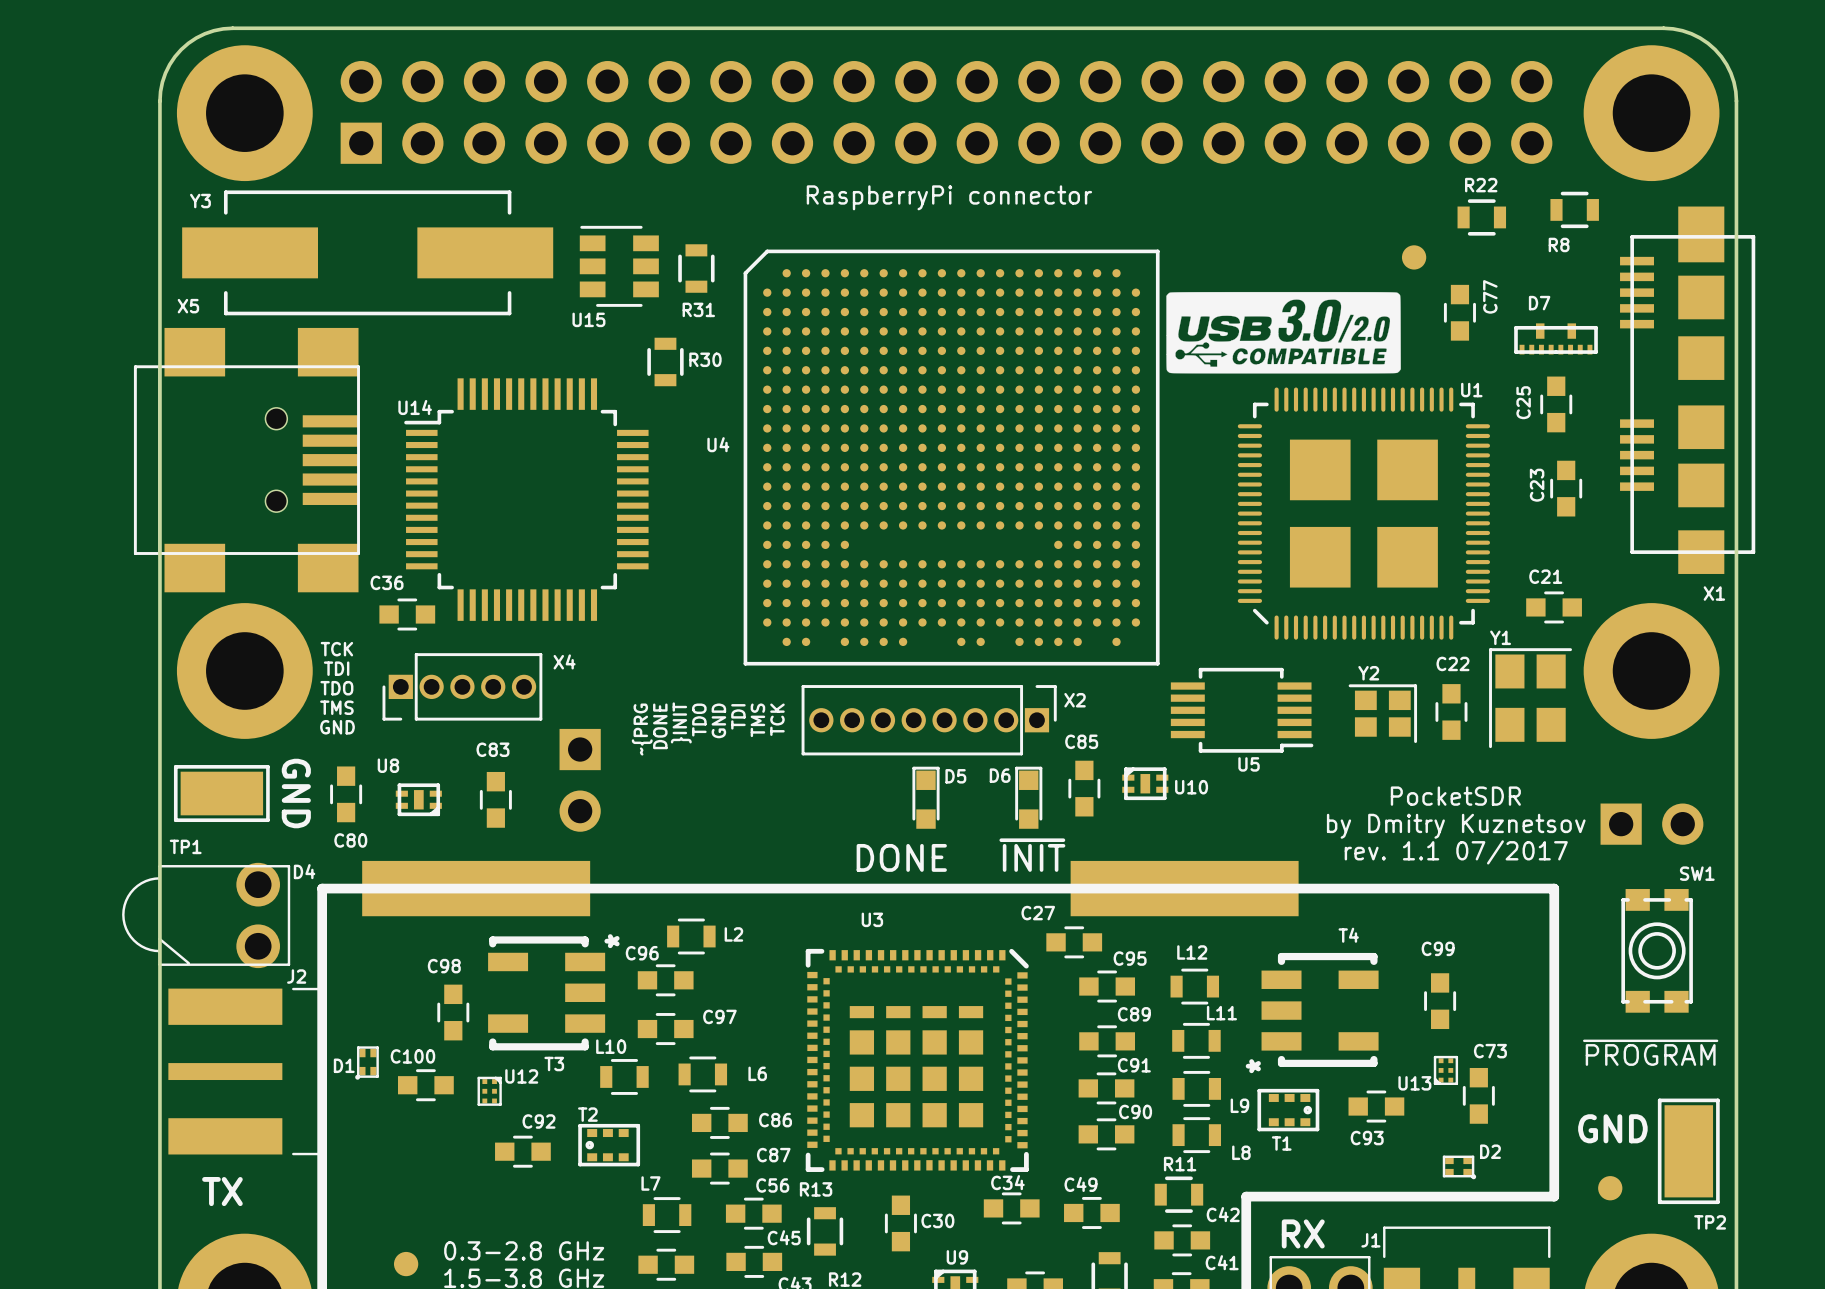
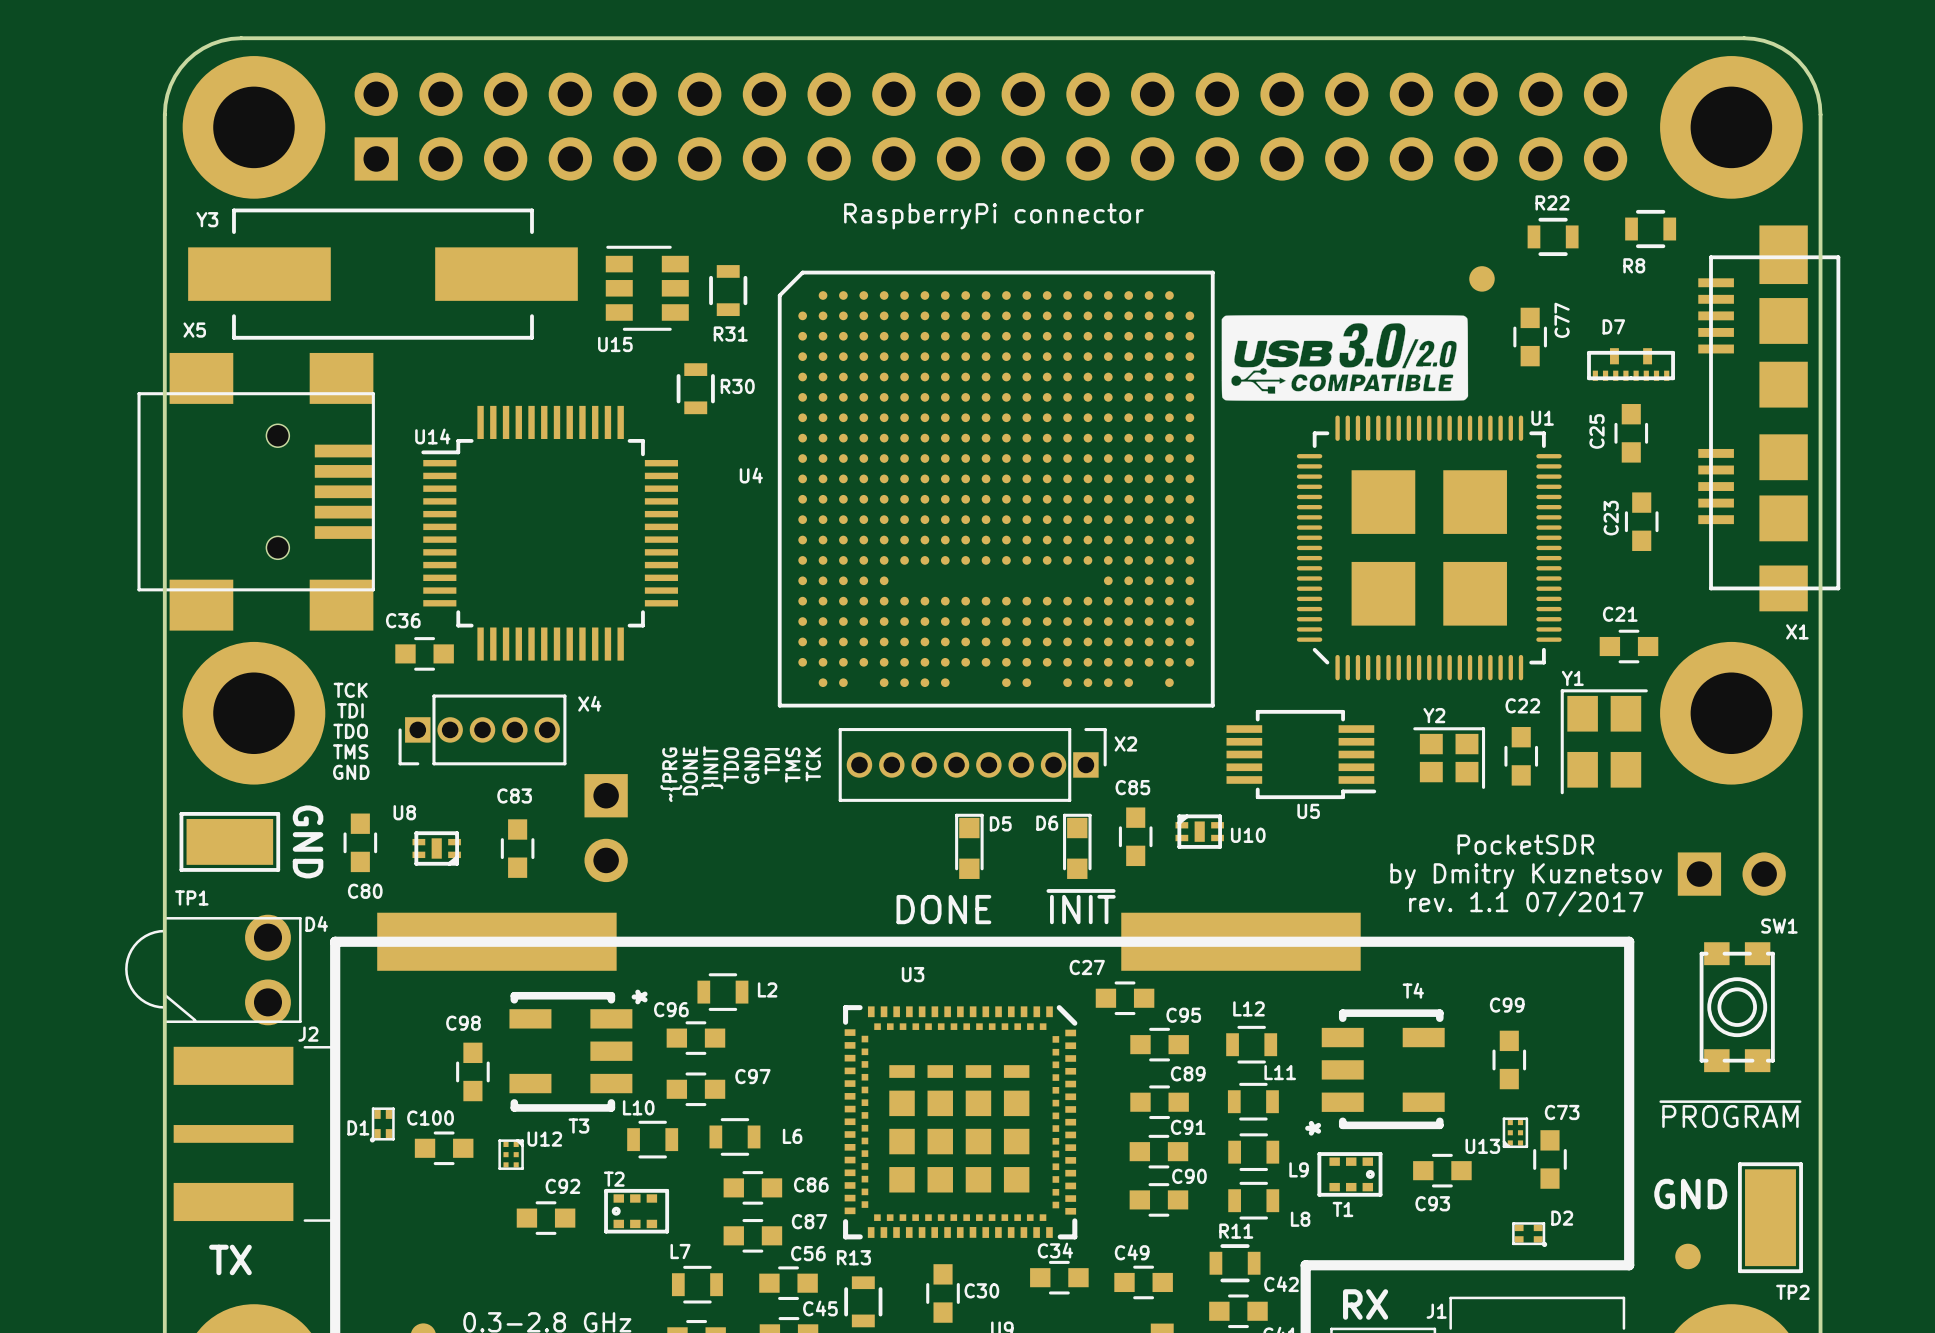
X5 footprint: [133, 327, 360, 593] -> [137, 352, 375, 631]

